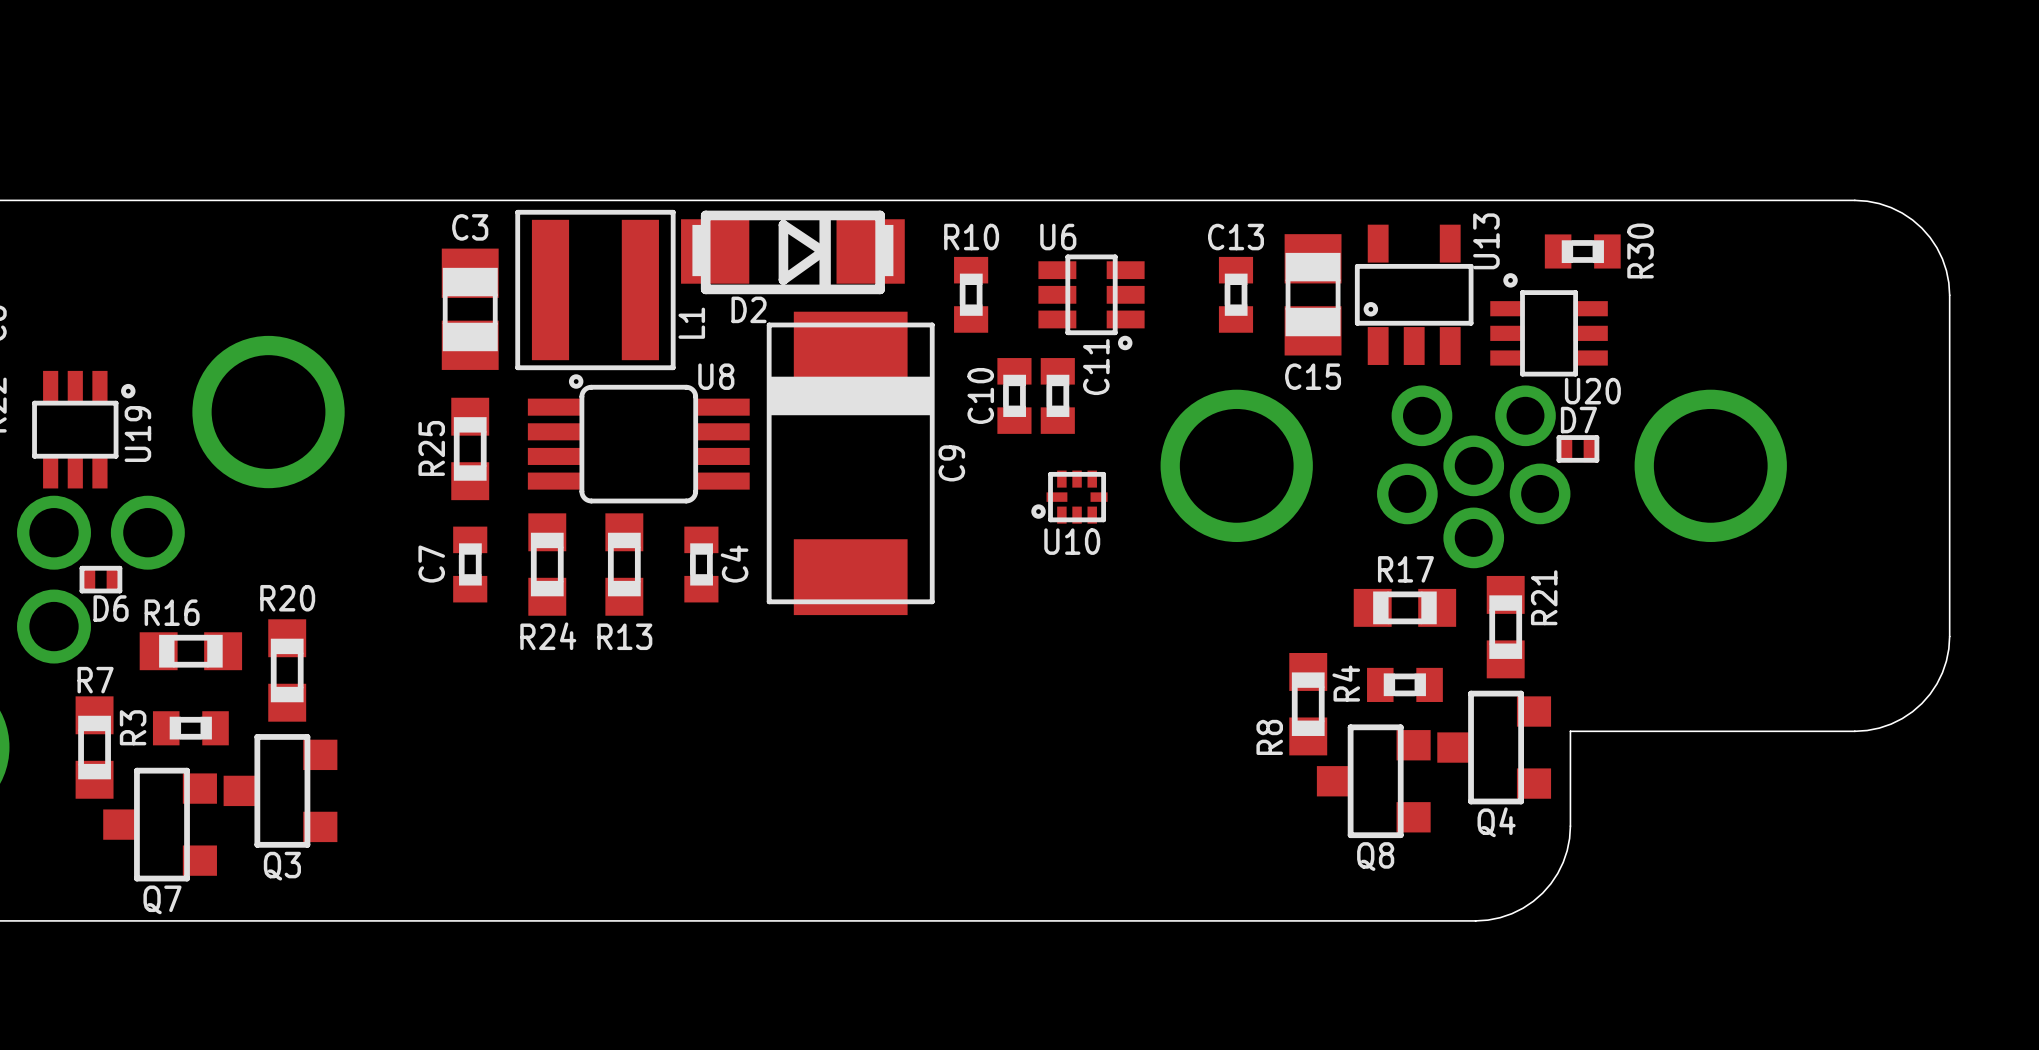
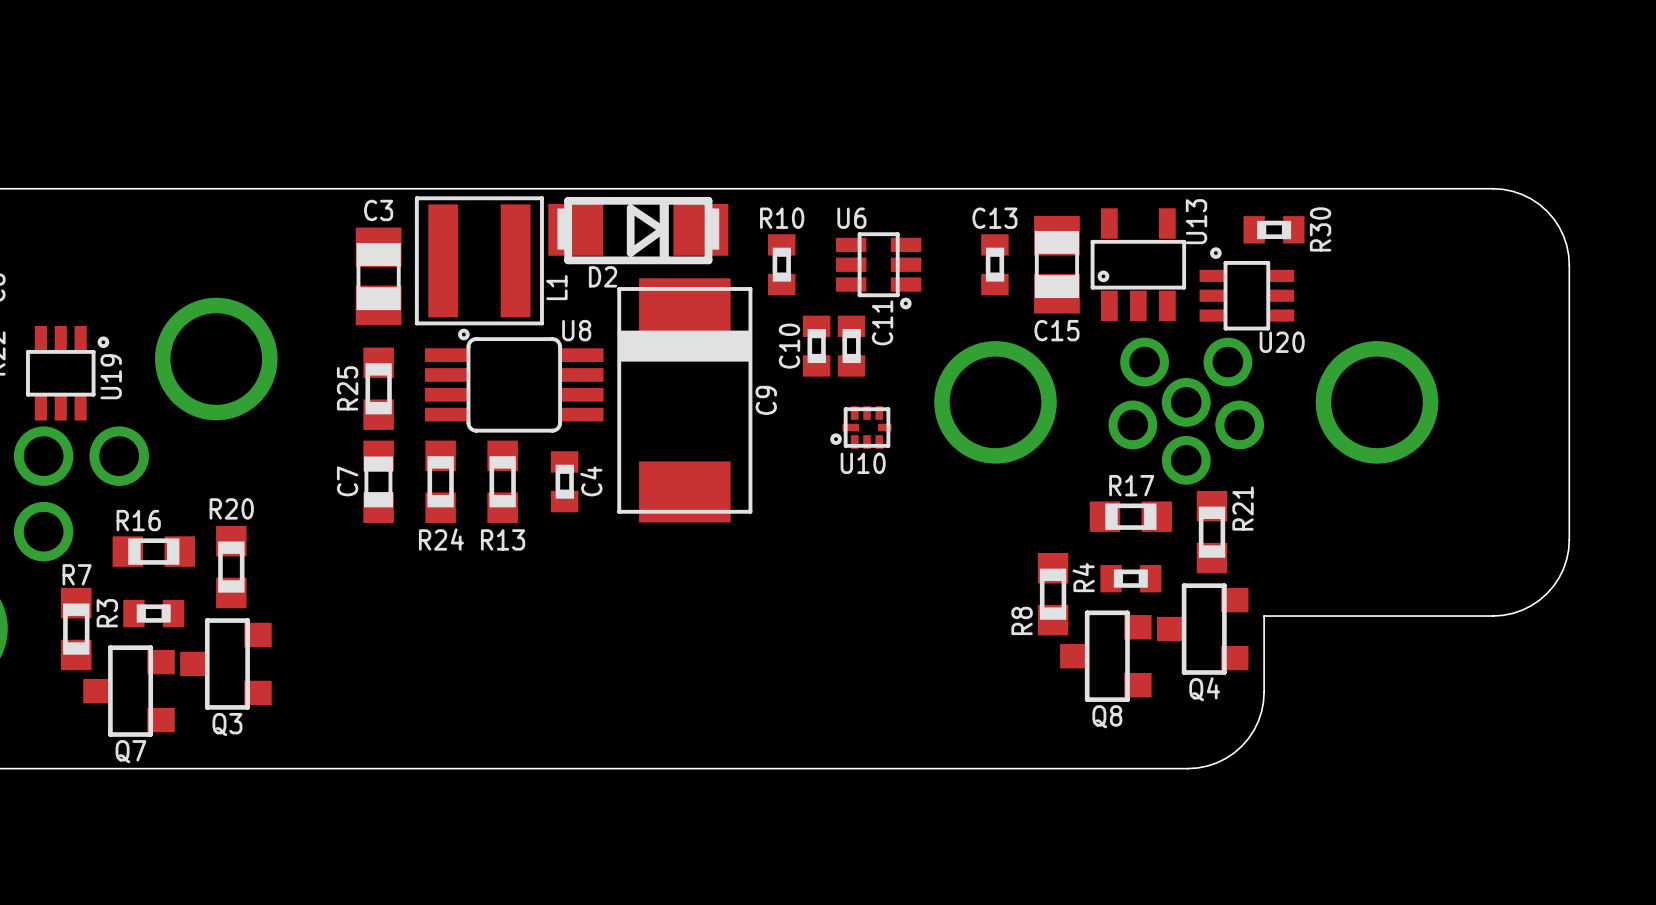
D7: (1577, 448) -> none
C7 footprint: [453, 526, 488, 603] -> [363, 440, 394, 523]
D6: (100, 579) -> none

